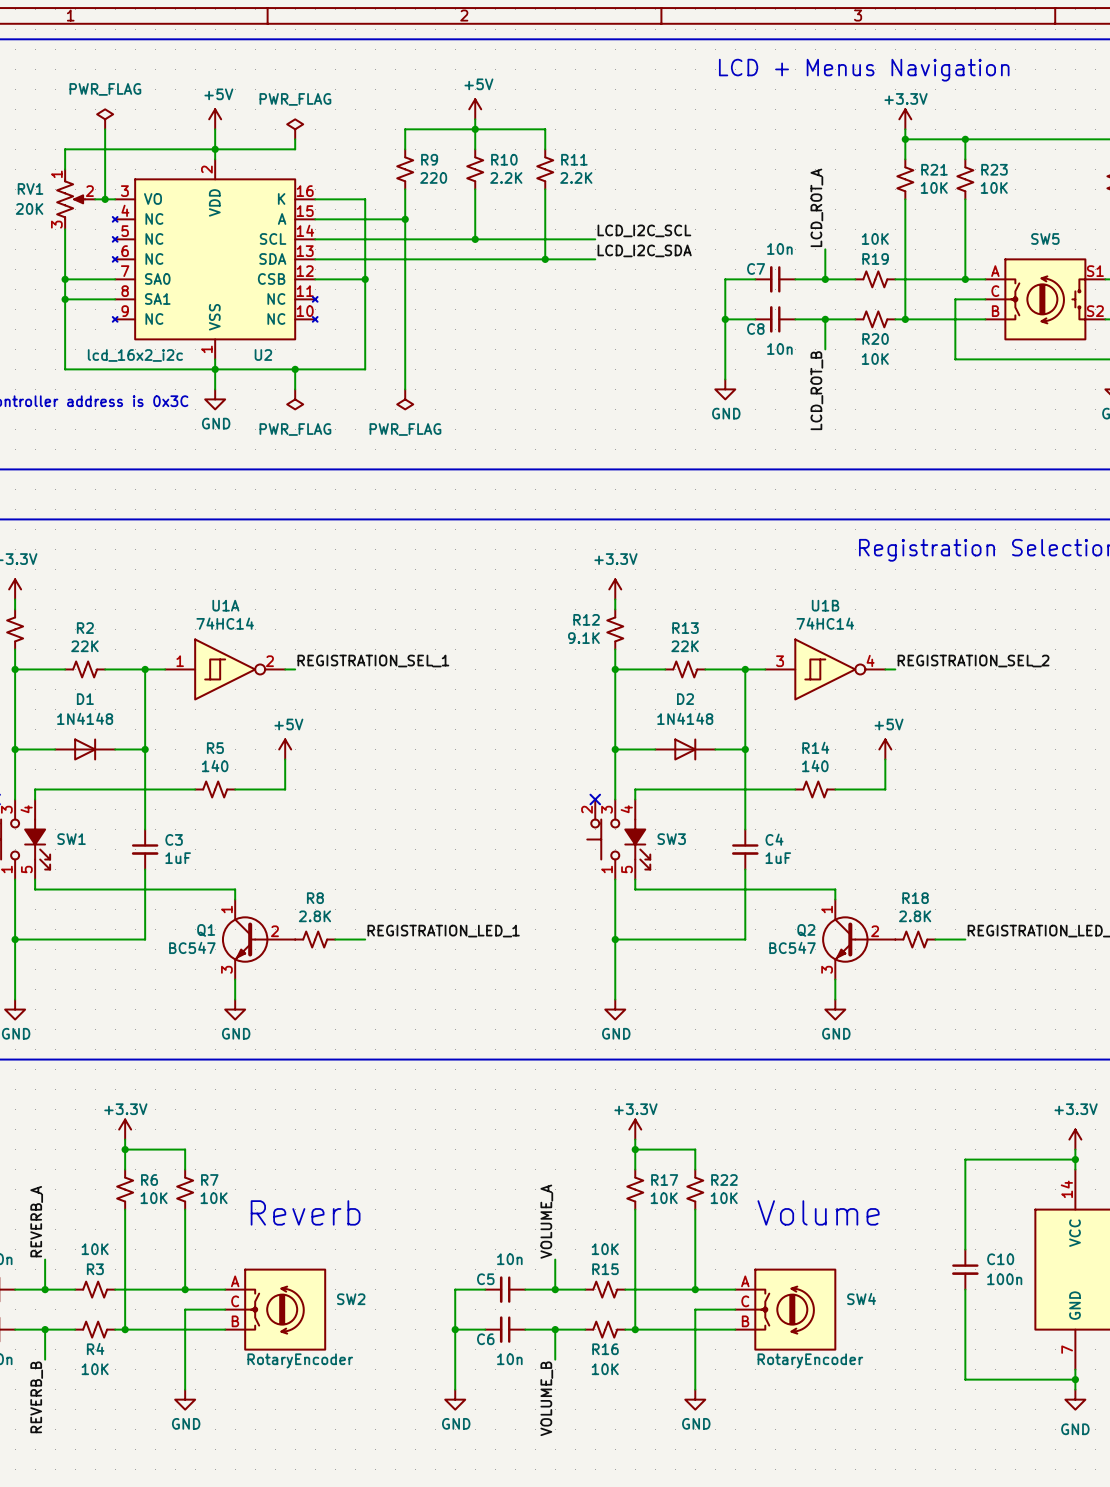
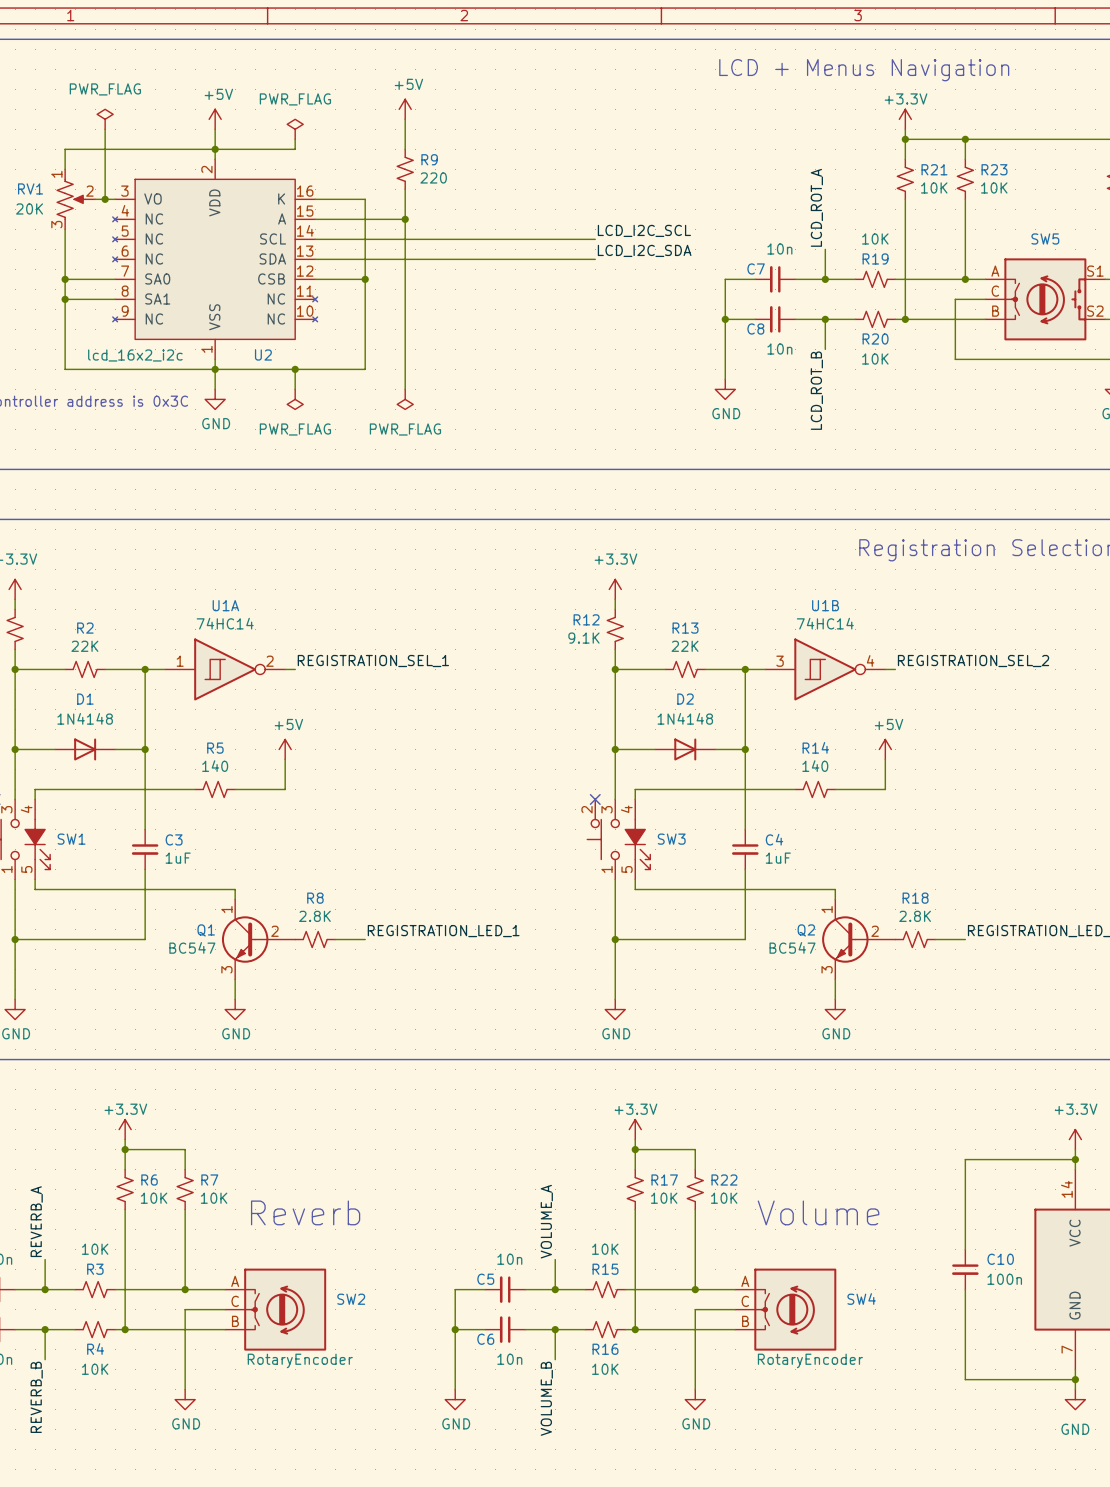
power symbol position: +5V (475, 109) -> +5V (405, 109)
wire: (475, 119) (475, 149) -> none
wire: (405, 129) (545, 129) (545, 149) -> (405, 129) (405, 119)
junction: (475, 129) -> none
R10: 2.2K (475, 169) -> none
R11: 2.2K (545, 169) -> none
wire: (475, 189) (475, 239) -> none
wire: (545, 189) (545, 259) -> none
junction: (475, 239) -> none
junction: (545, 259) -> none

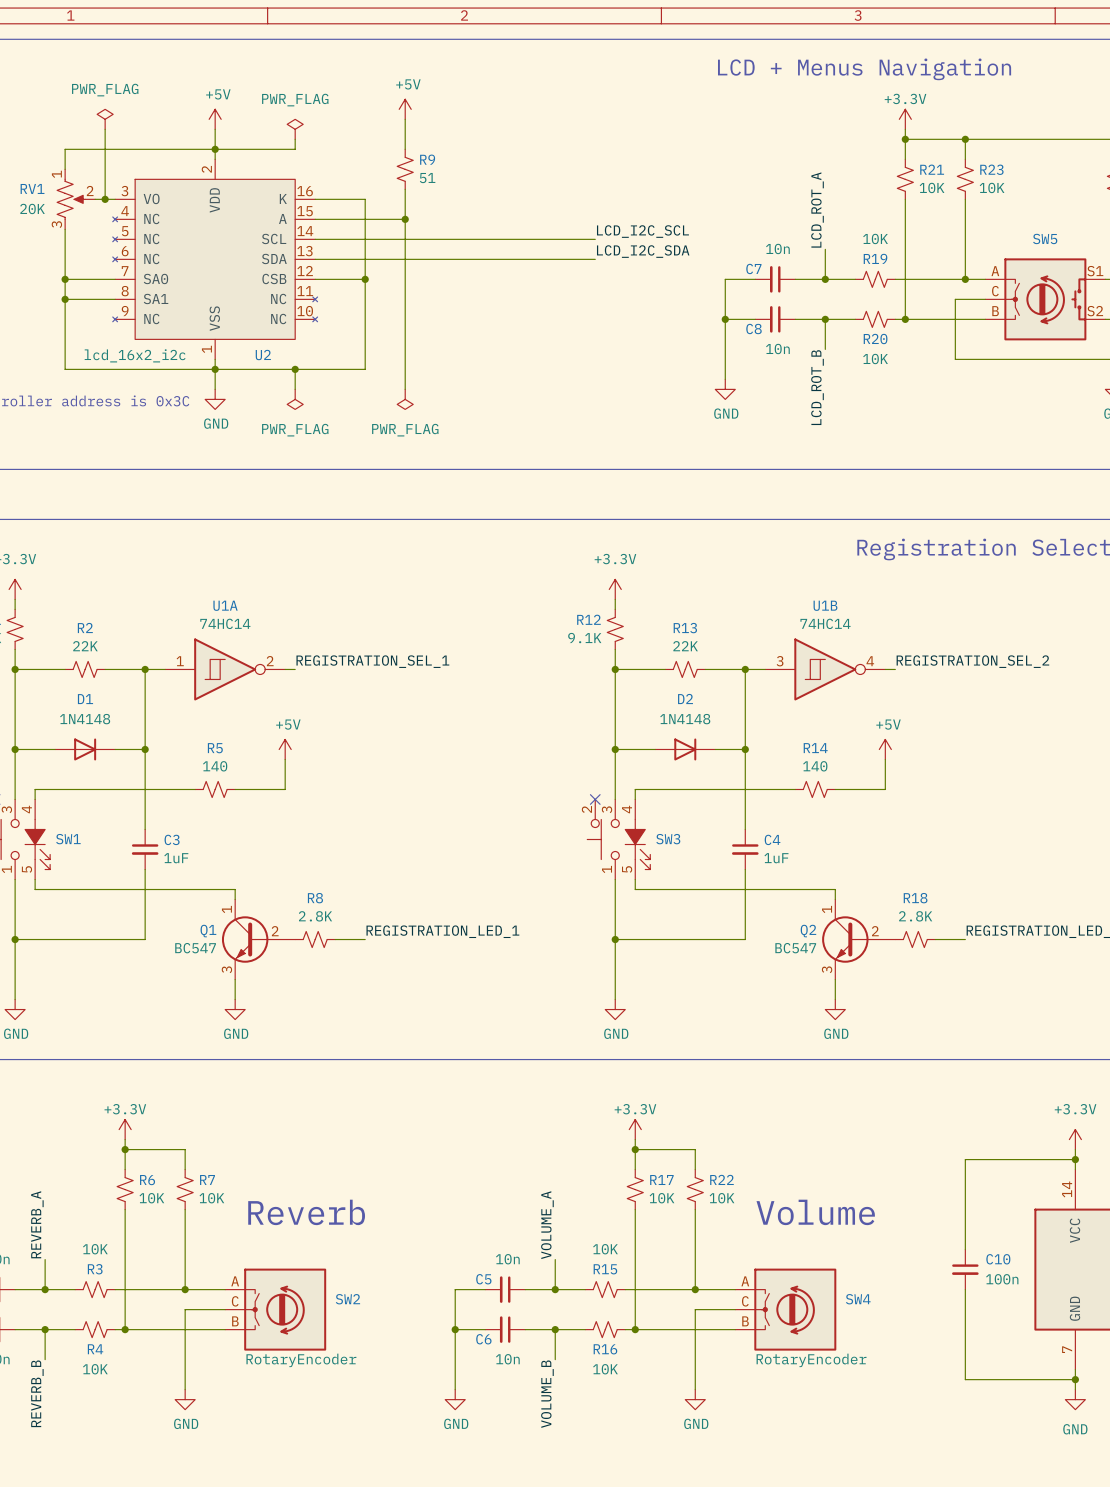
R9 value: 220 (433, 177) -> 51 (427, 178)

